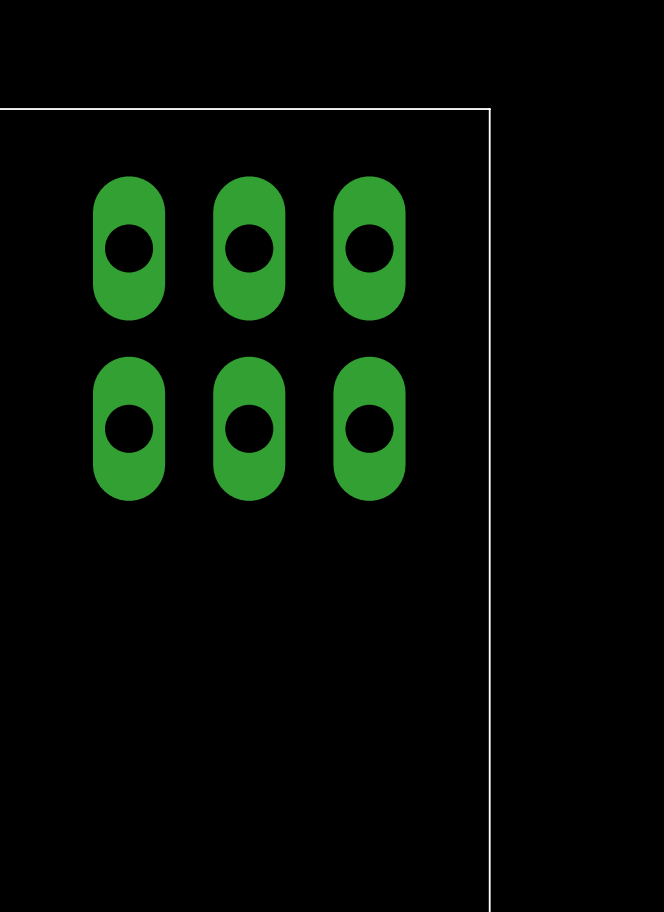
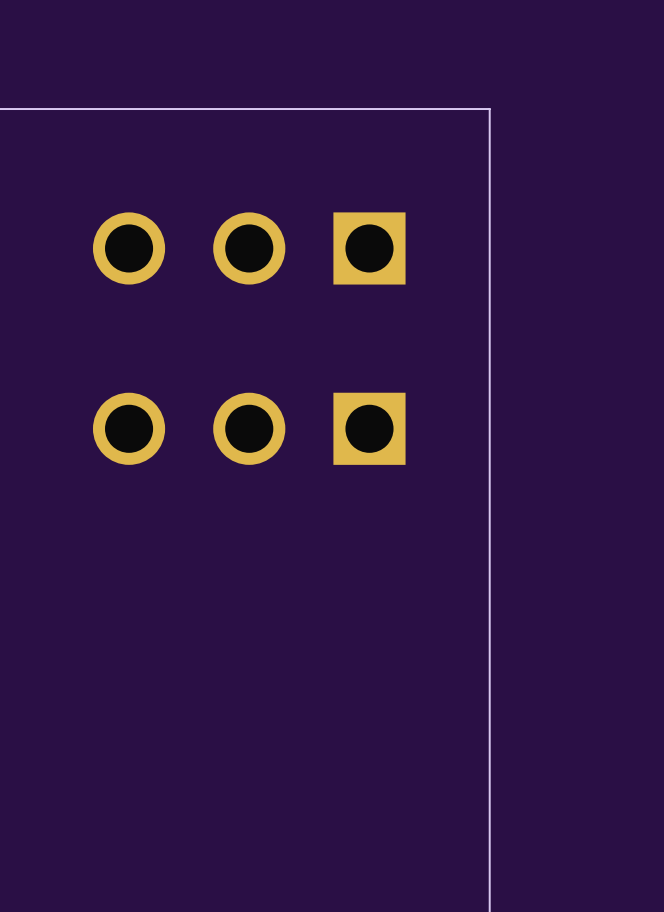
part footprint: [92, 176, 406, 321] -> [92, 212, 406, 285]
part footprint: [92, 356, 406, 501] -> [92, 392, 406, 465]

